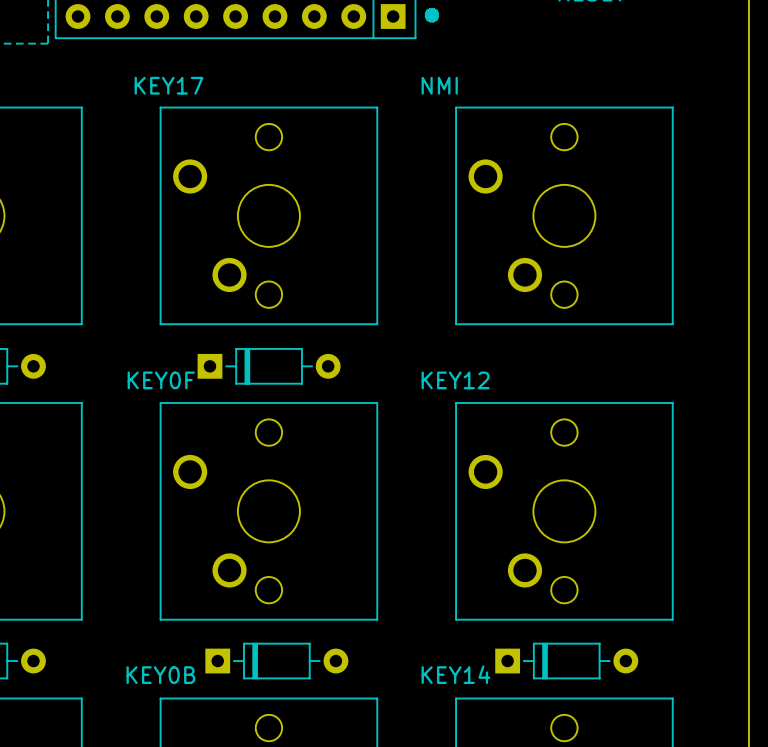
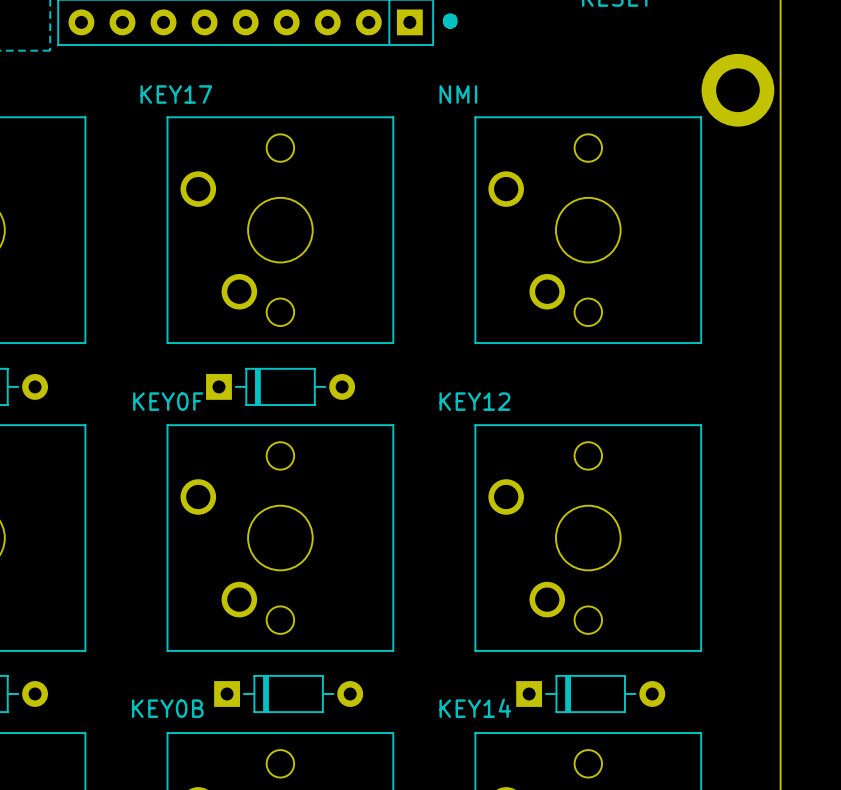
part: none -> (737, 90)

